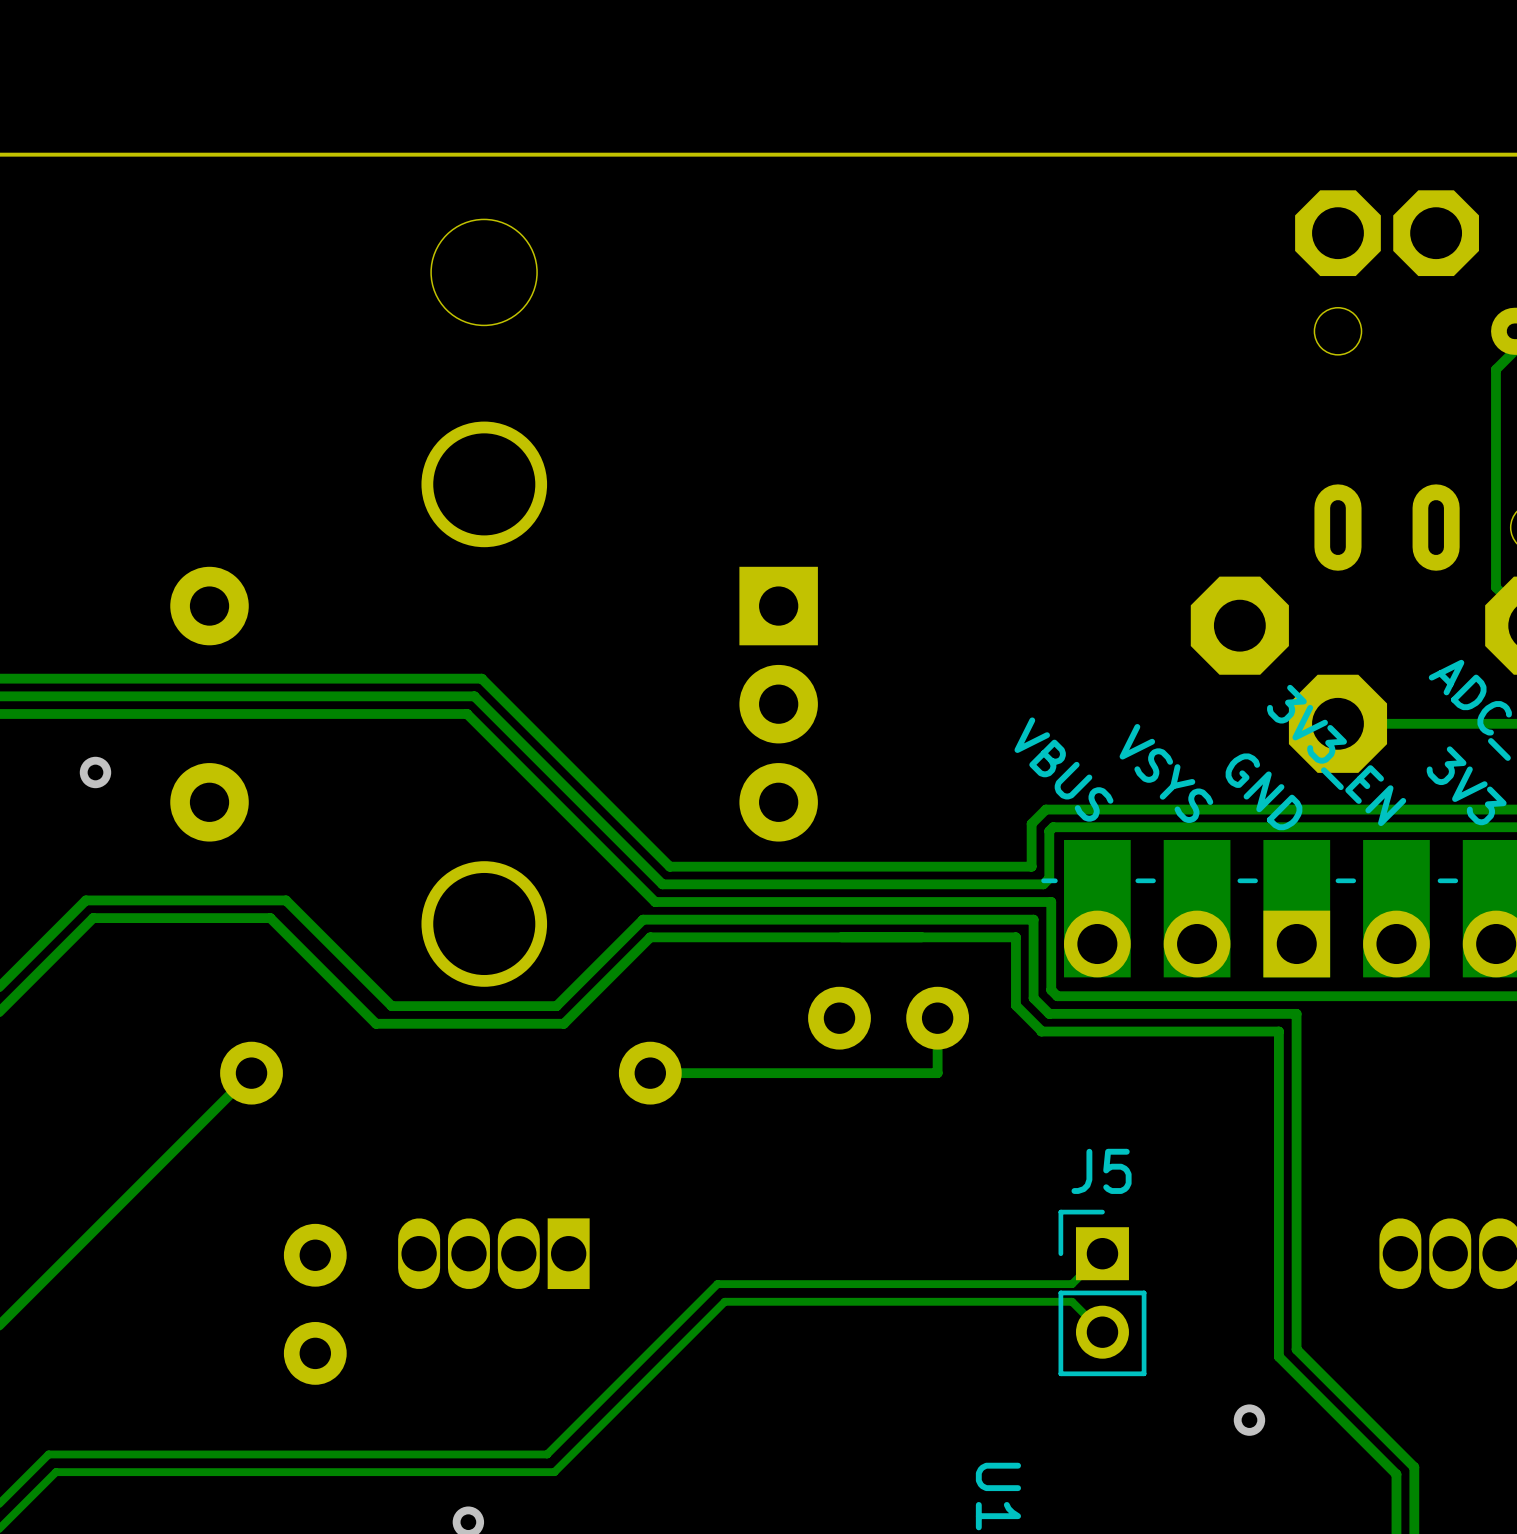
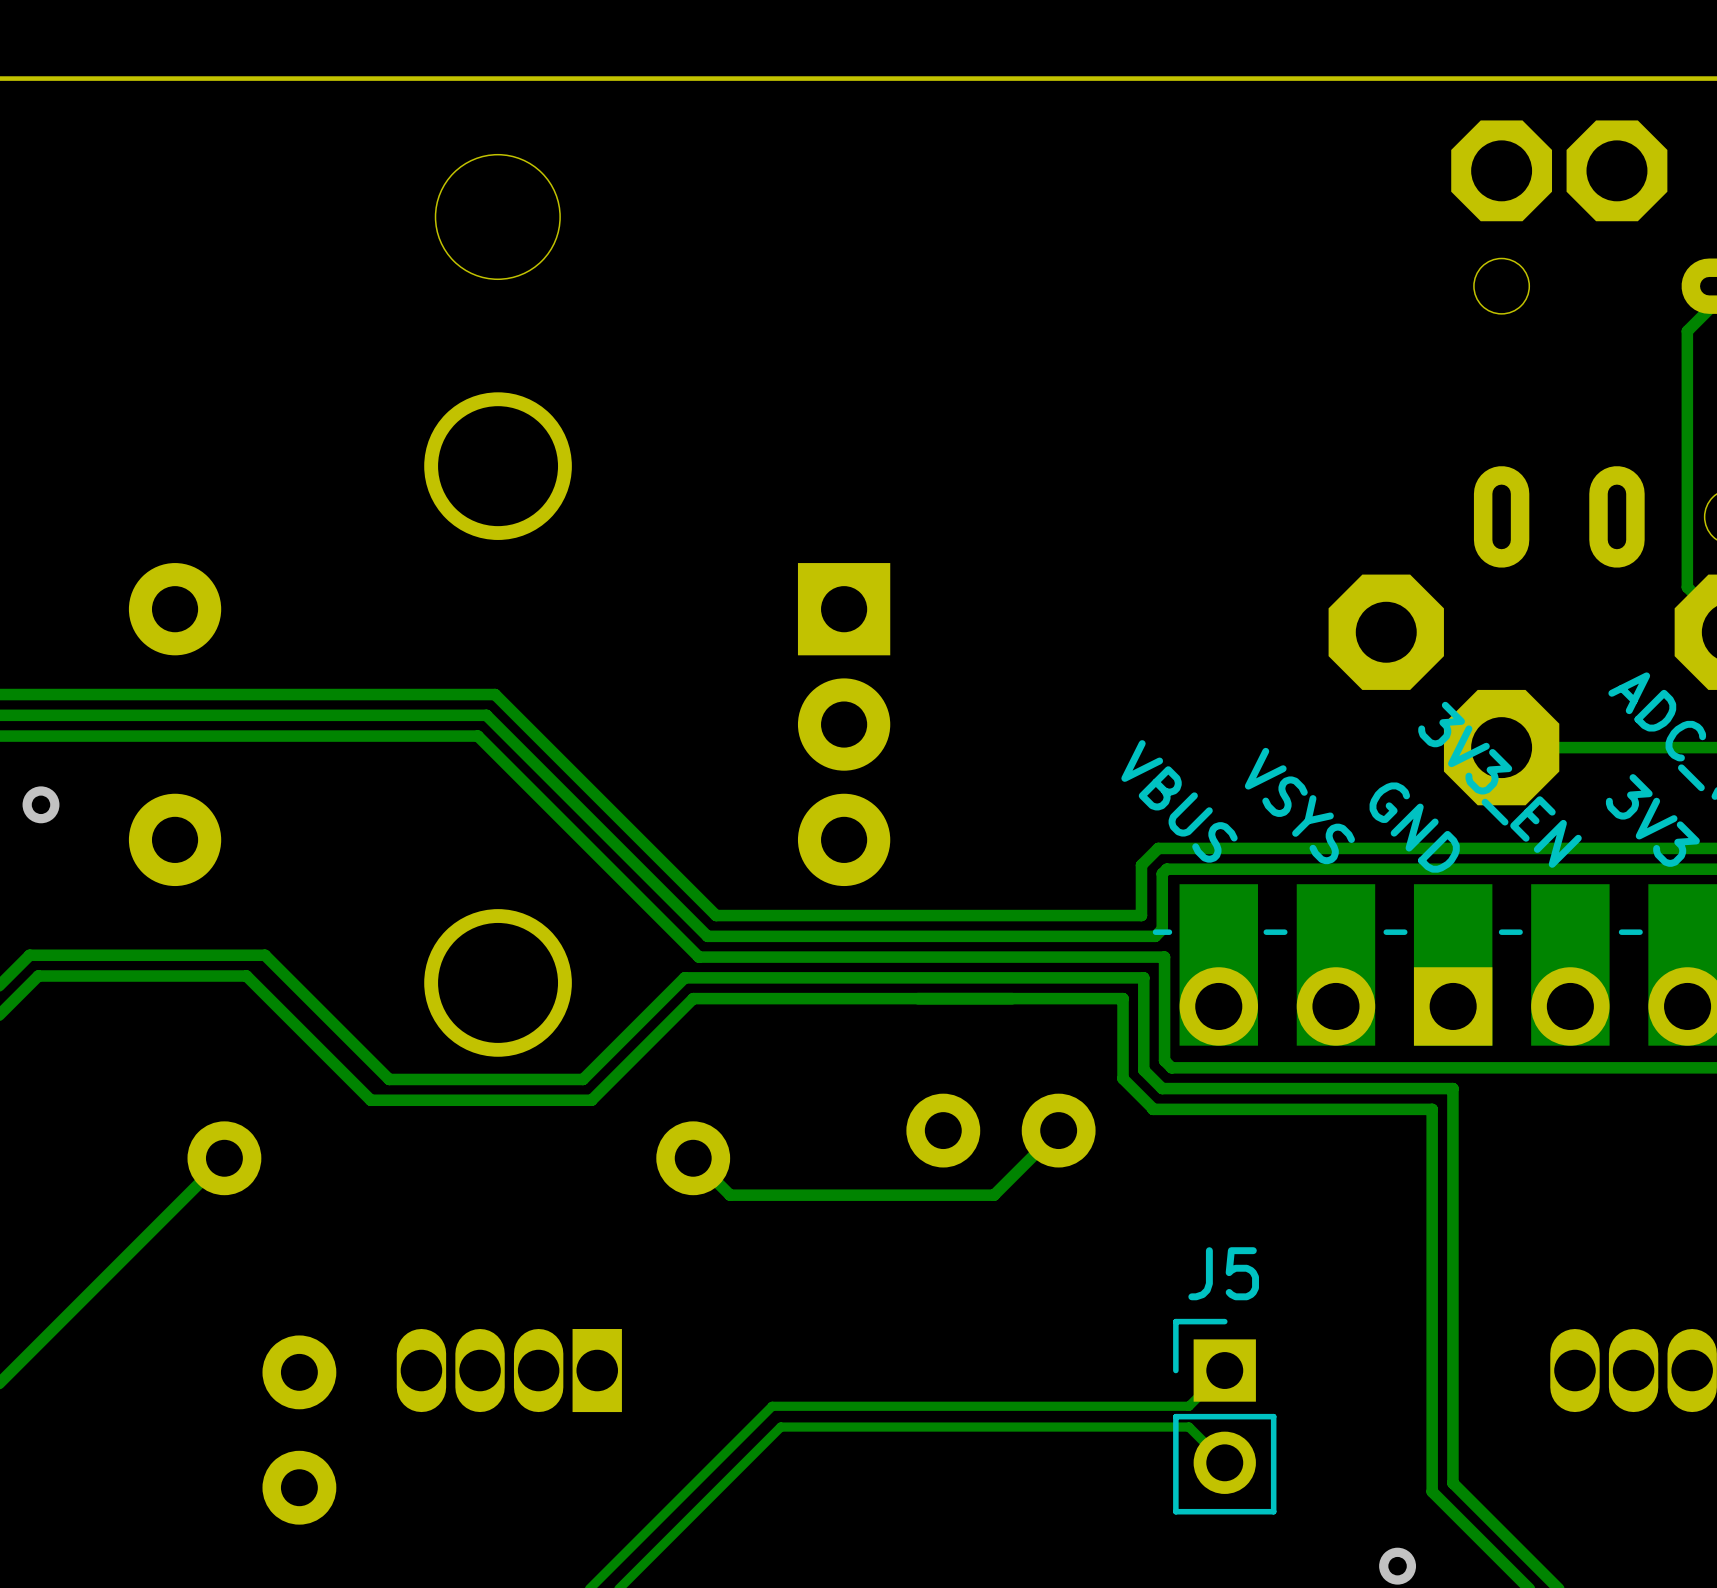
part position: (888, 1018) -> (1000, 1130)
track: (937, 1018) (937, 1073) (650, 1073) -> (1058, 1130) (994, 1195) (730, 1195) (693, 1158)

